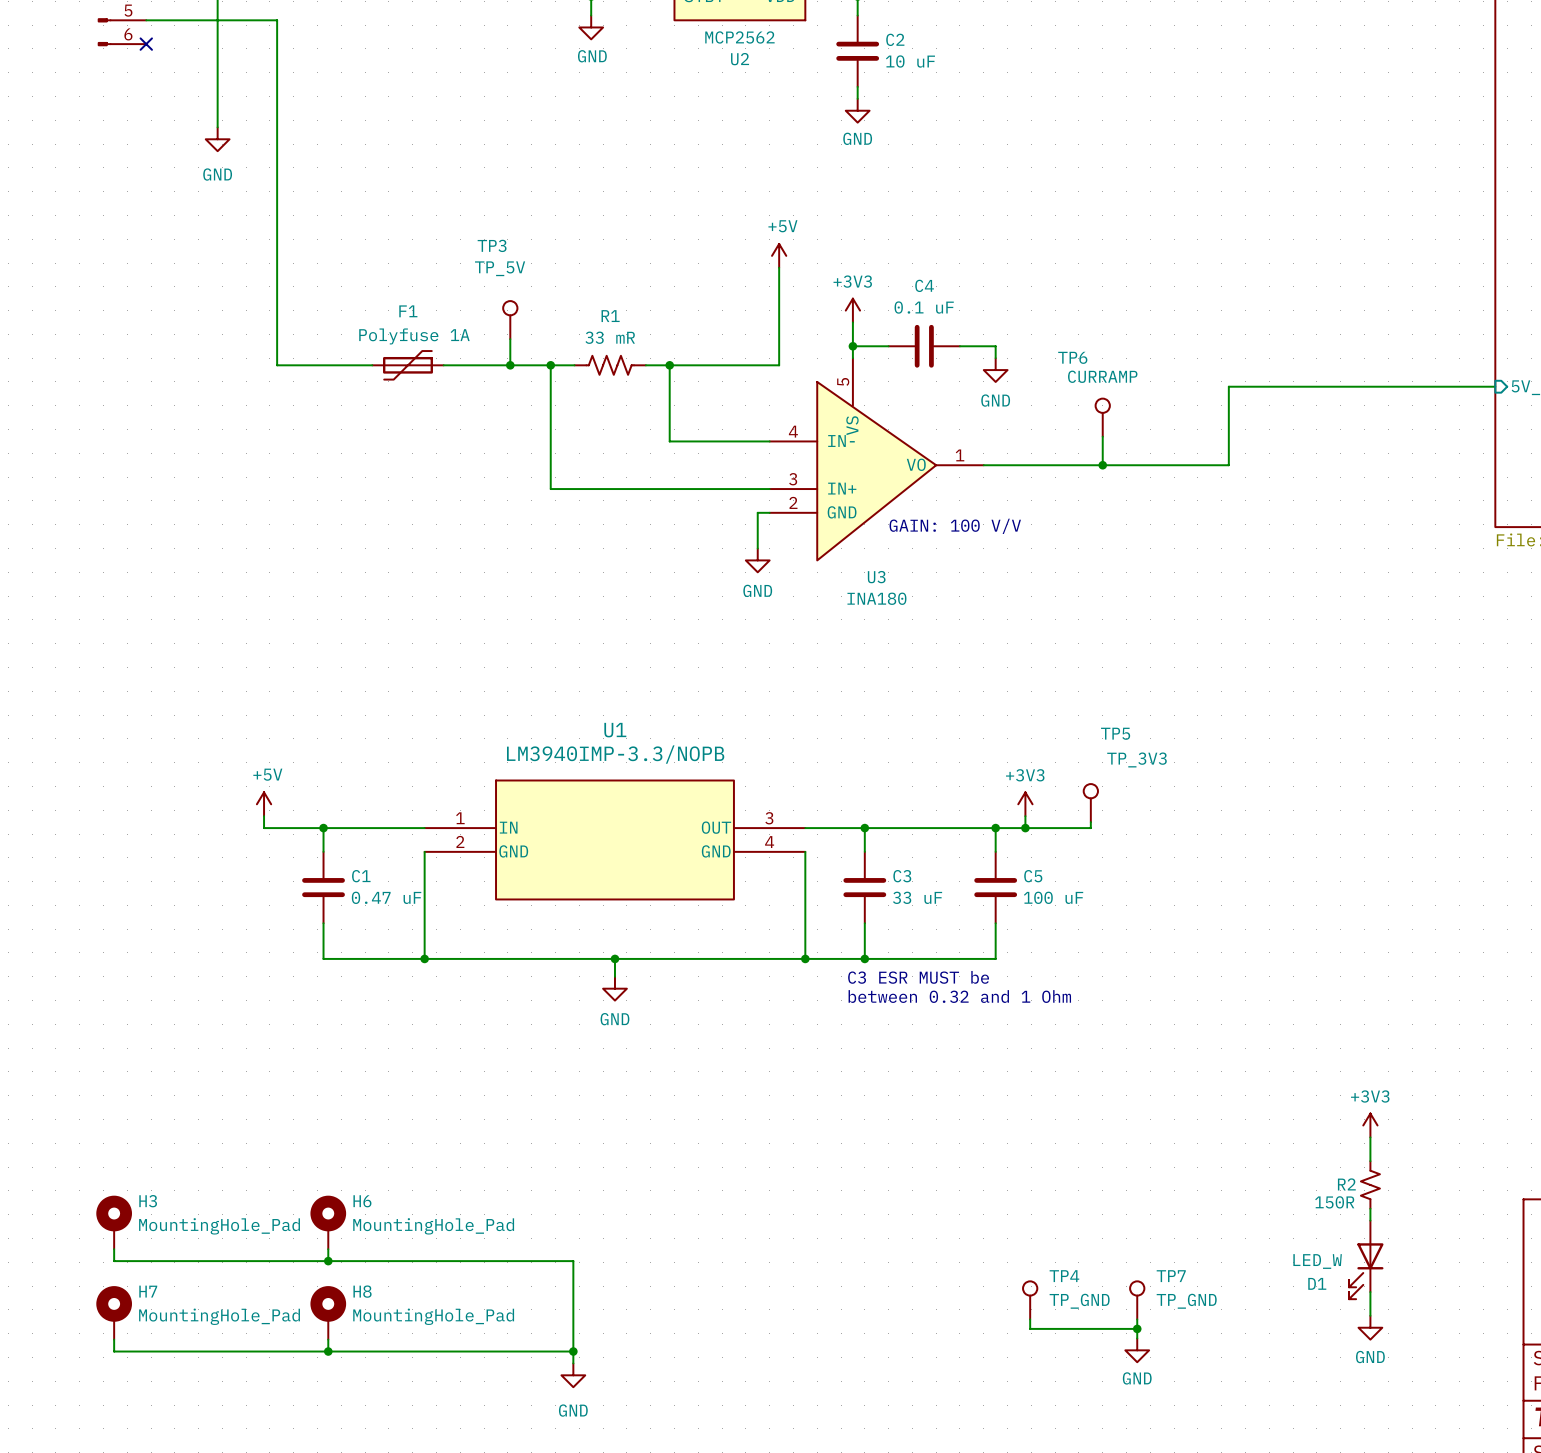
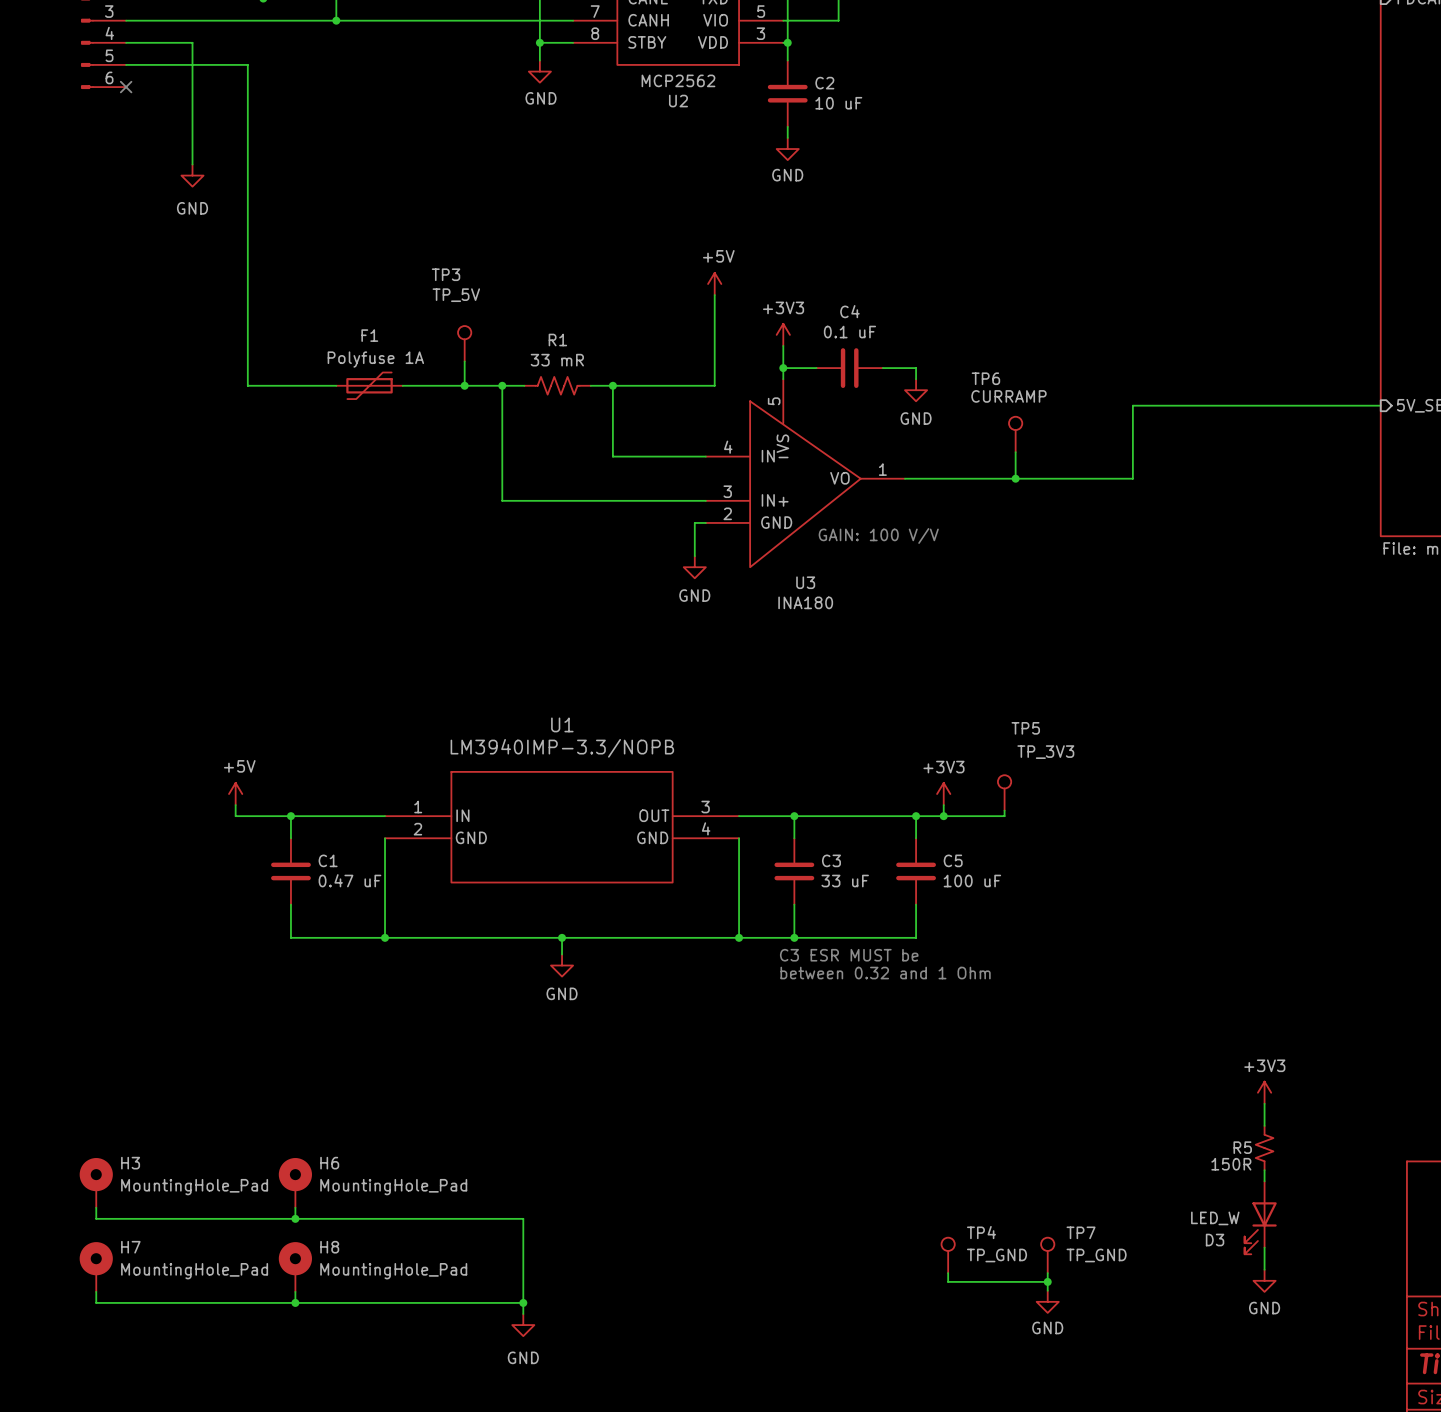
R2 name: R2 (1346, 1184) -> R5 (1242, 1147)
D1 name: D1 (1317, 1283) -> D3 (1215, 1240)

